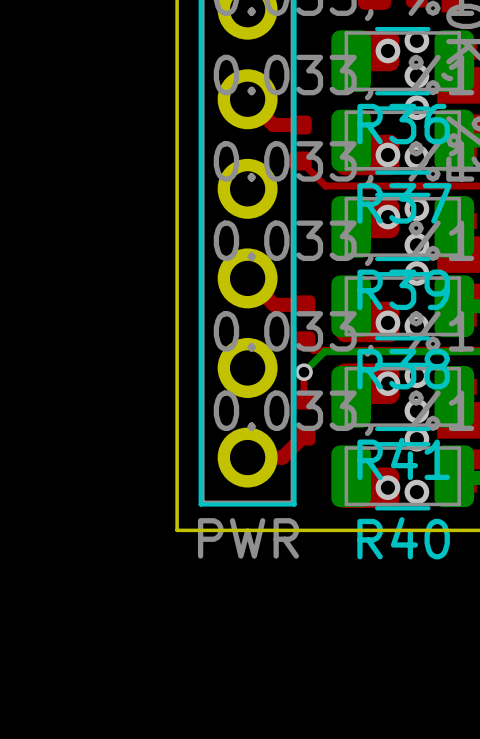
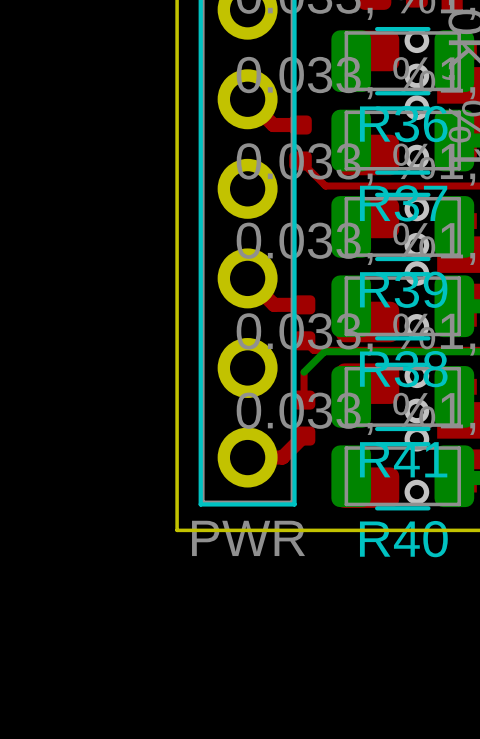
via: (387, 50) -> none
via: (387, 154) -> none
via: (387, 217) -> none
via: (387, 322) -> none
via: (304, 372) -> none
via: (387, 383) -> none
via: (387, 487) -> none

